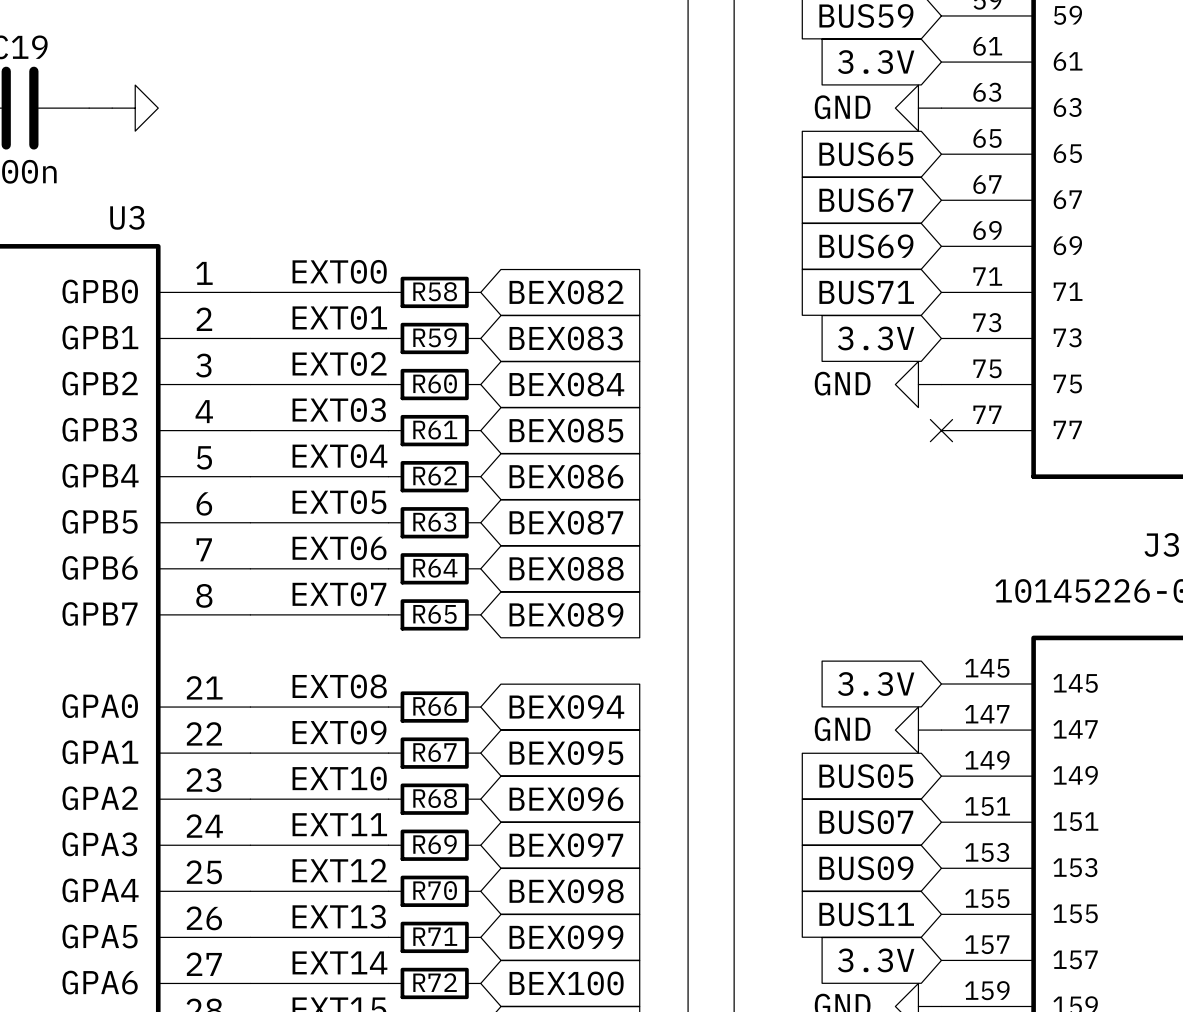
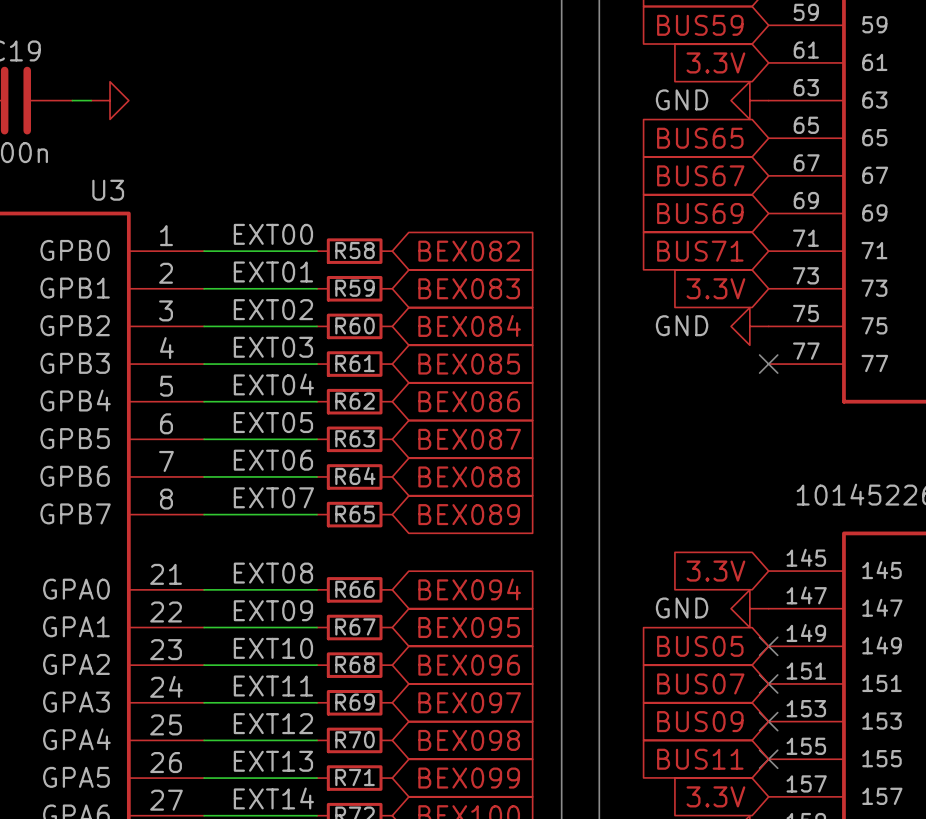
no-connect mark: none -> (768, 646)
no-connect mark: none -> (768, 683)
no-connect mark: none -> (768, 721)
no-connect mark: none -> (768, 759)

